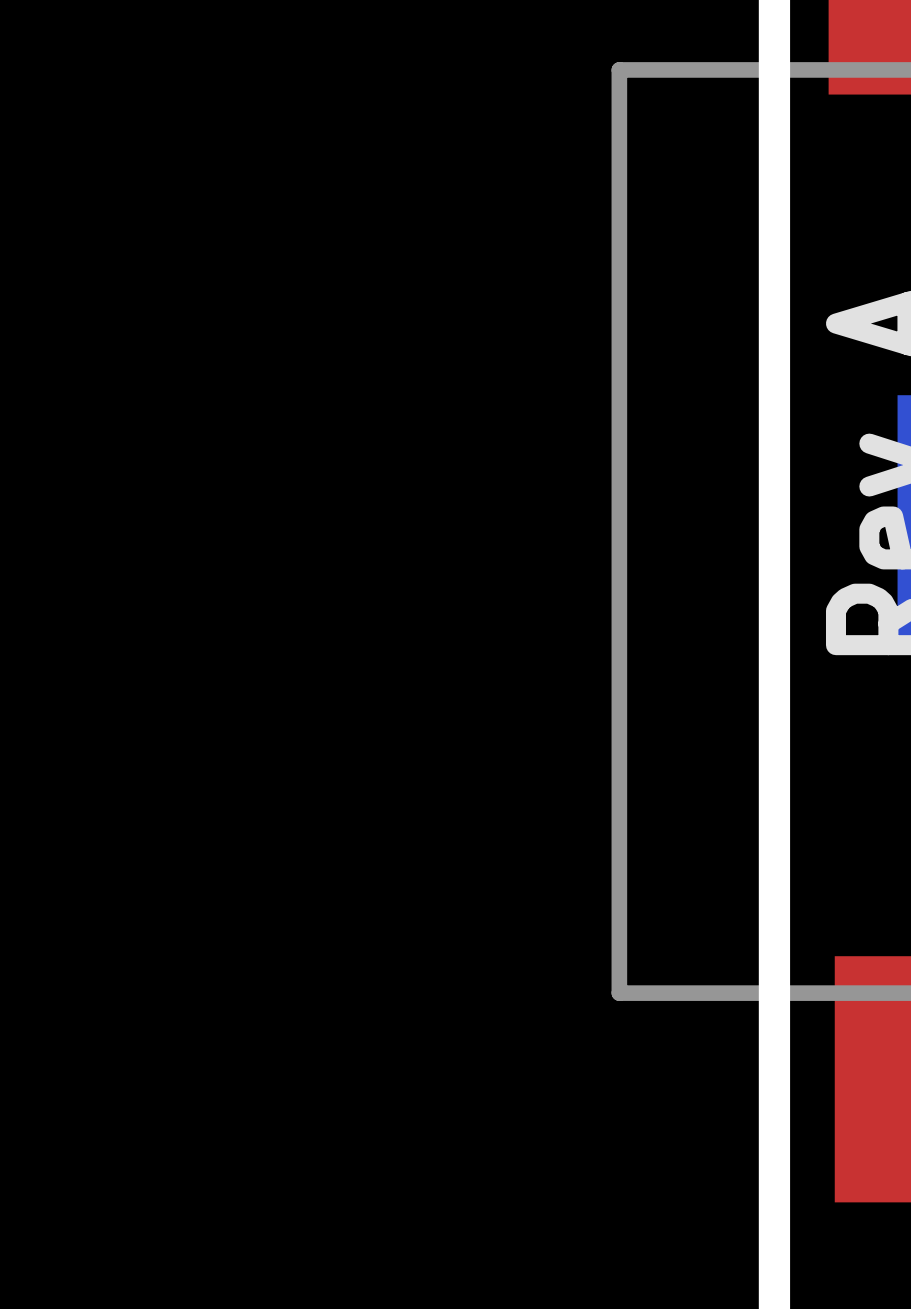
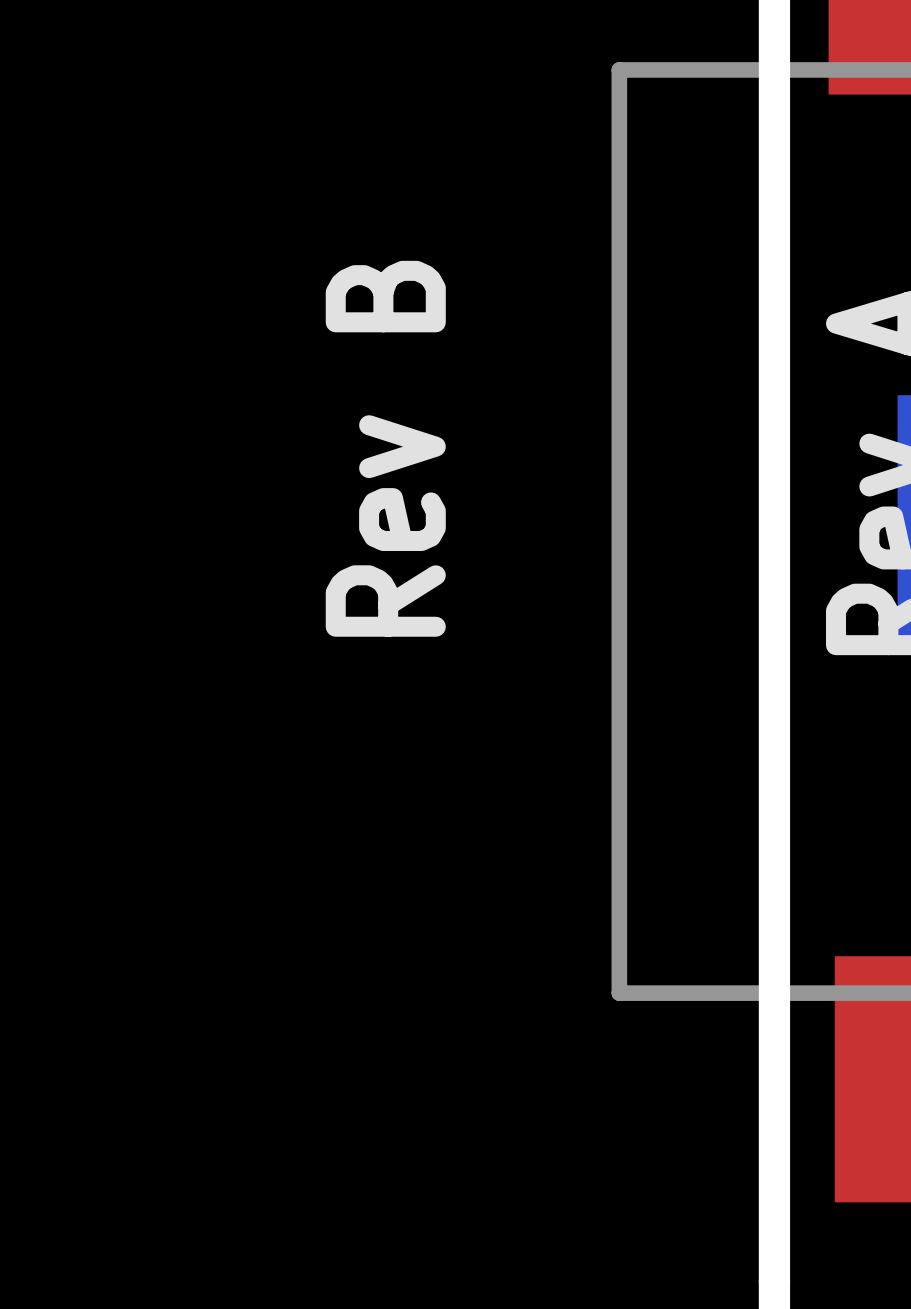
text: none -> Rev B (385, 448)

